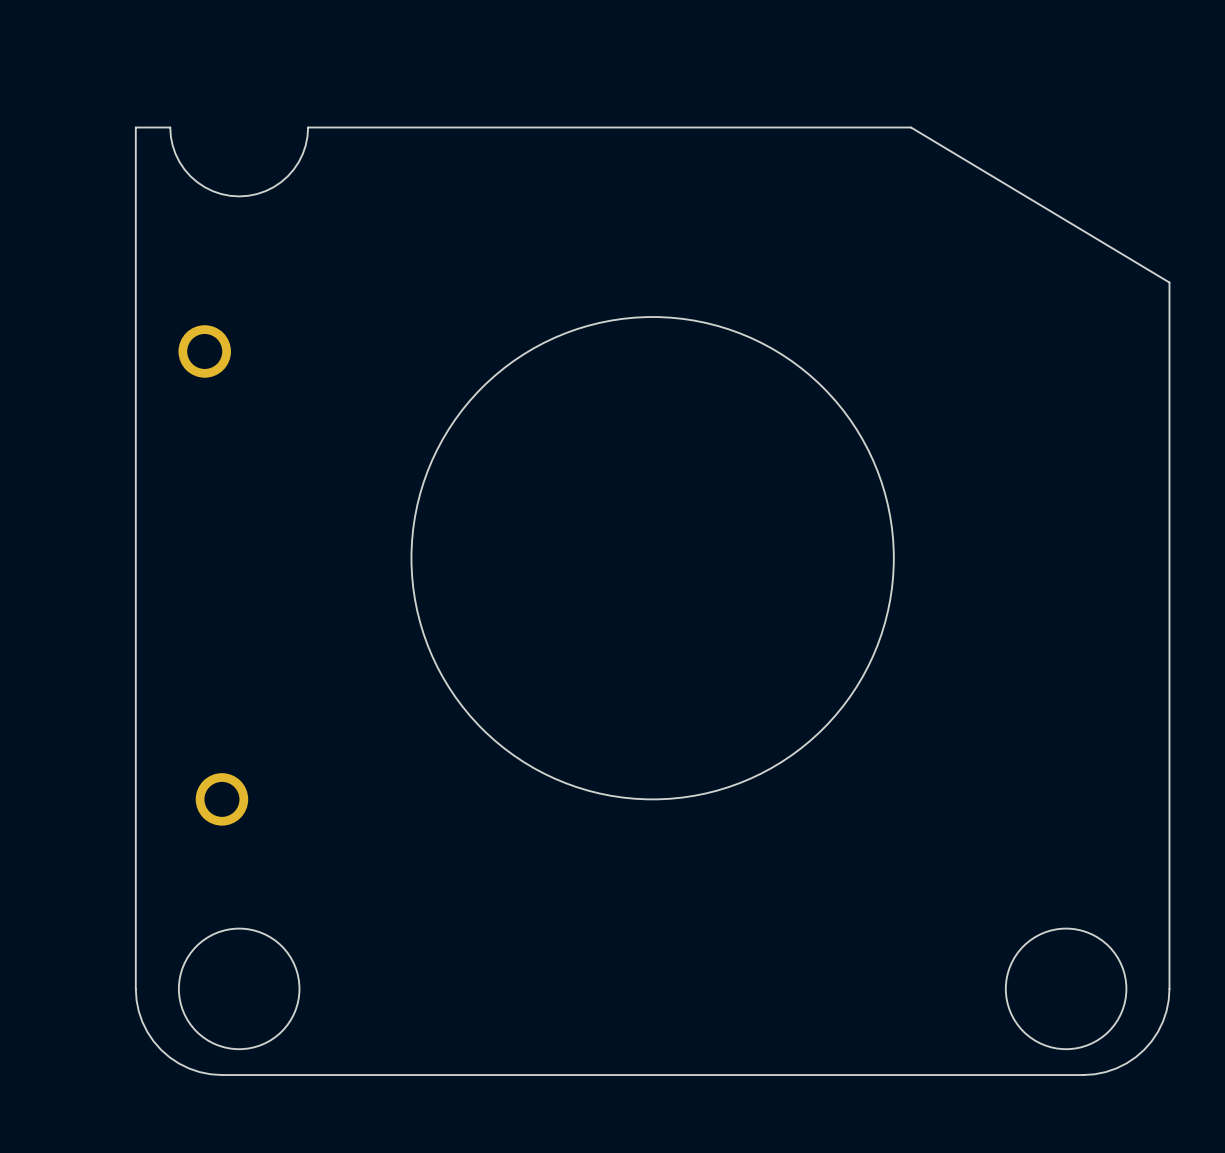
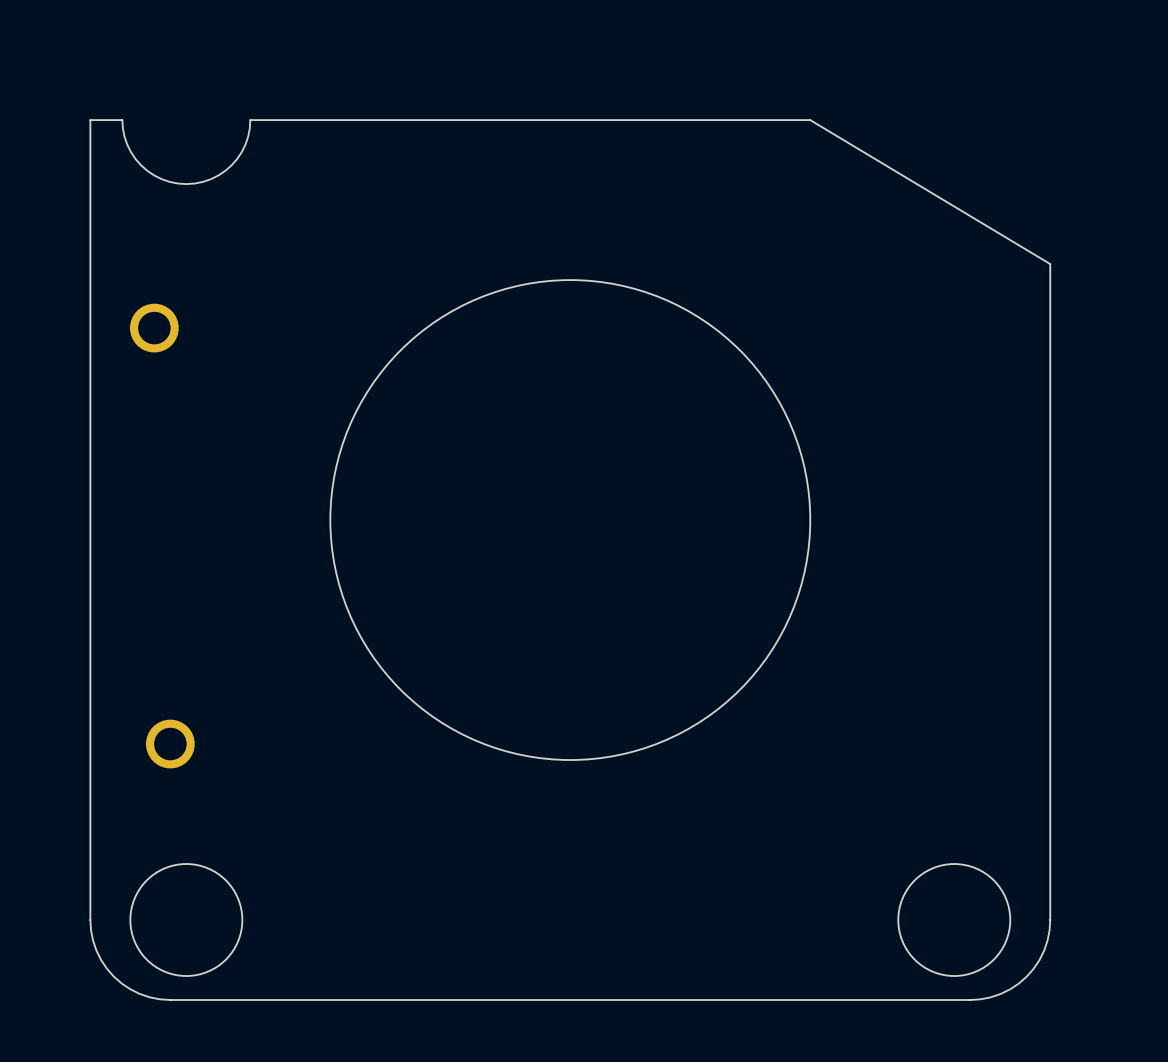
round board edge size: [411, 317, 894, 800] -> [330, 280, 811, 761]

